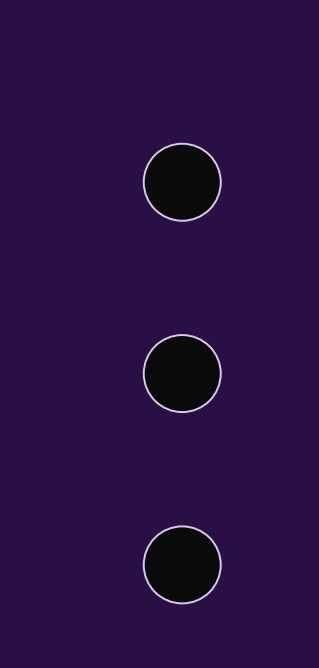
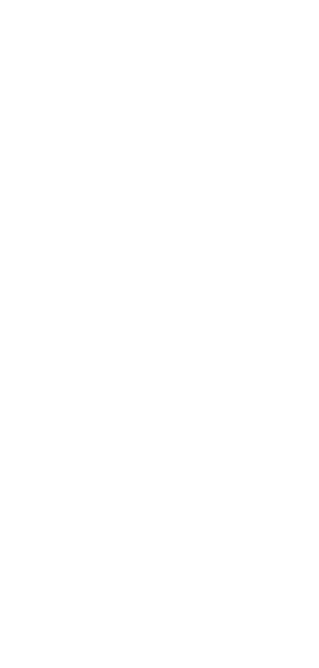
part: (182, 182) -> none
part: (182, 373) -> none
part: (182, 564) -> none

